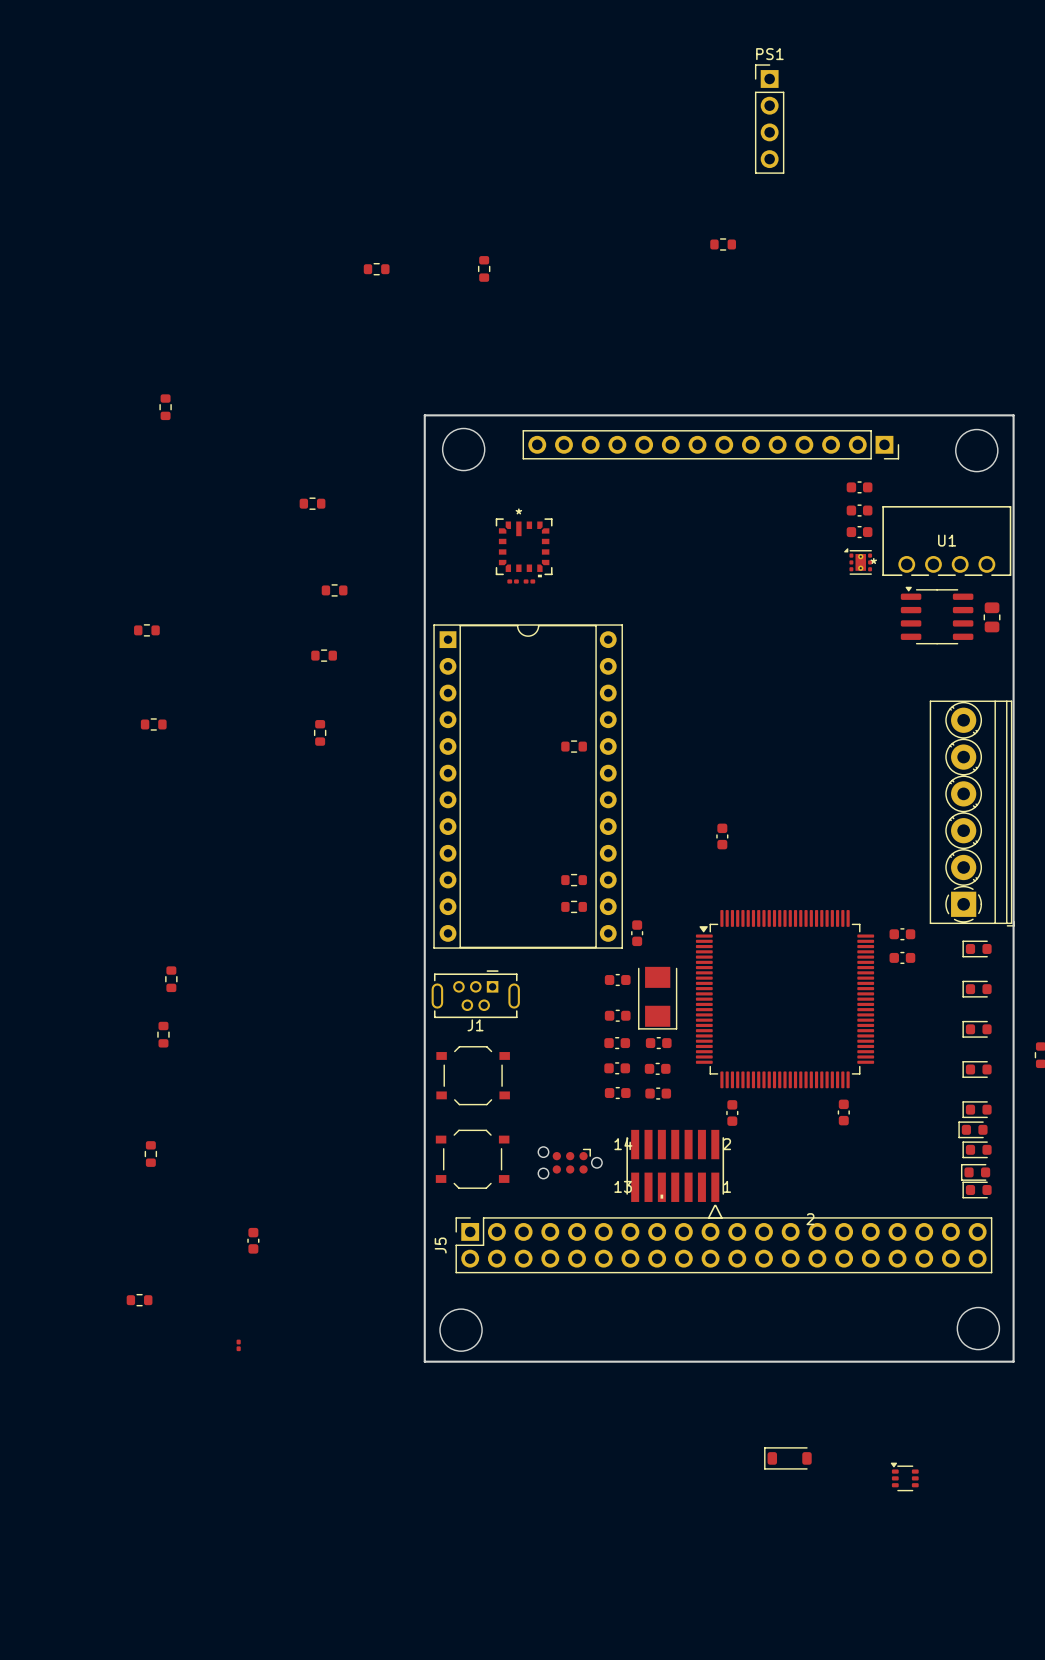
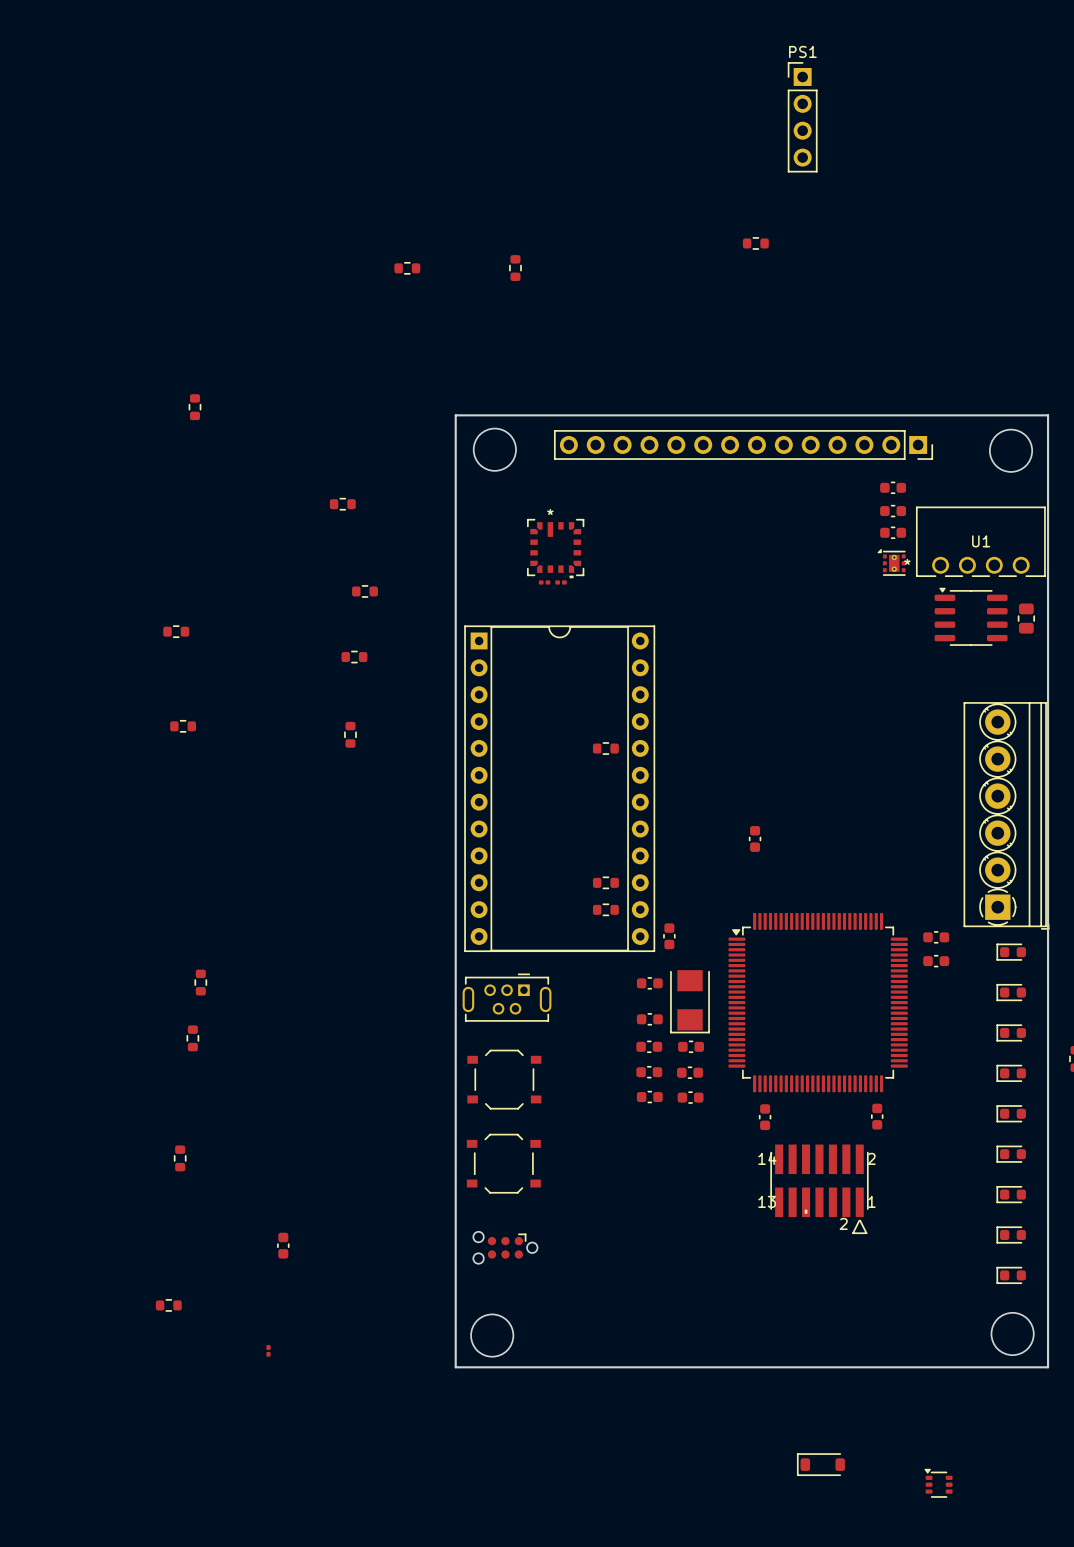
J1 name: J1 (475, 1025) -> none
part: (973, 1129) -> none
part position: (570, 1162) -> (505, 1247)
part: (975, 1172) -> none
part position: (675, 1174) -> (819, 1189)
part: none -> (1011, 1235)
J5: (723, 1245) -> none
part: none -> (1011, 1275)

